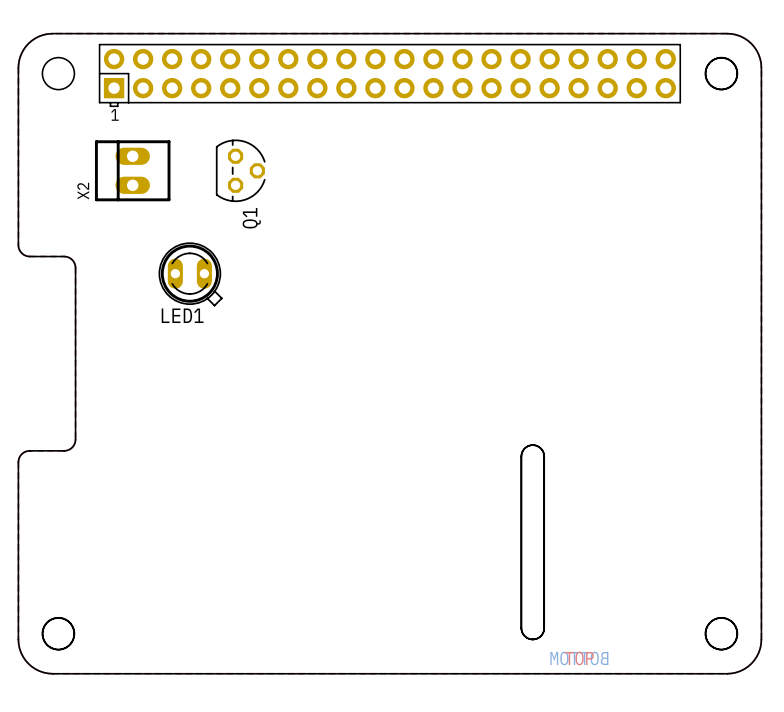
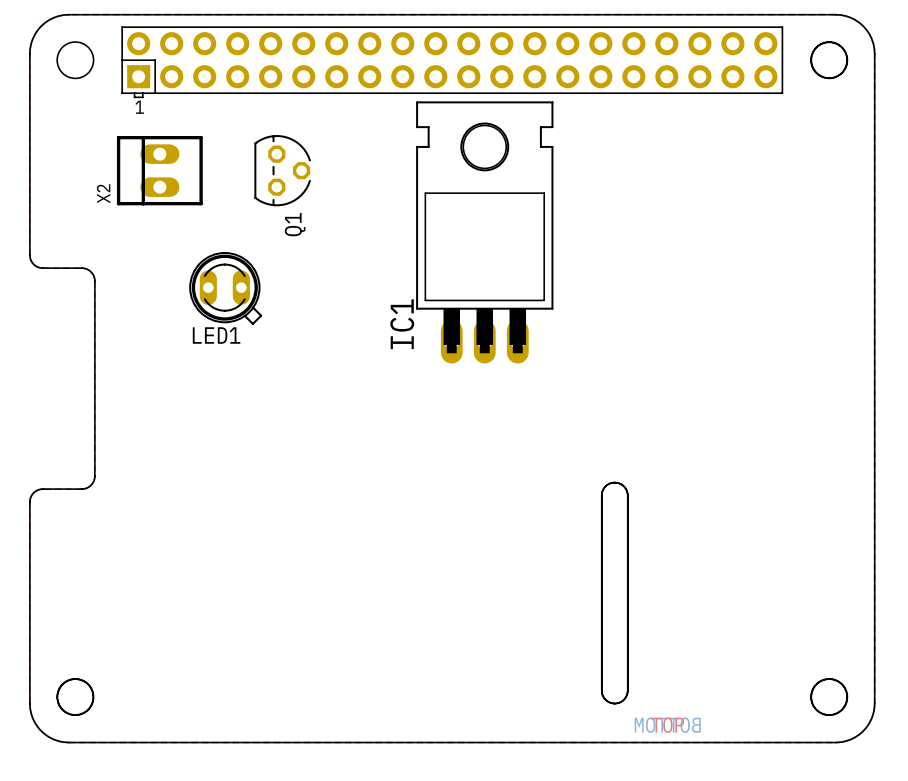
IC1: none -> (484, 232)

